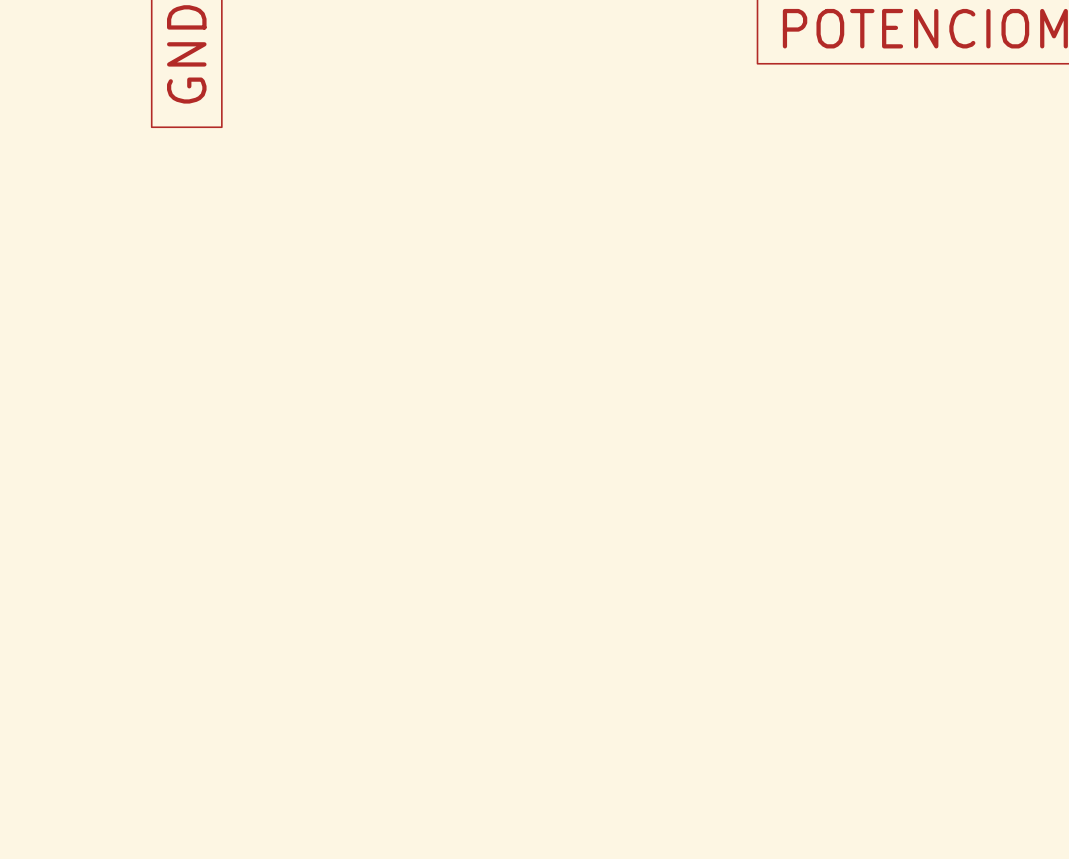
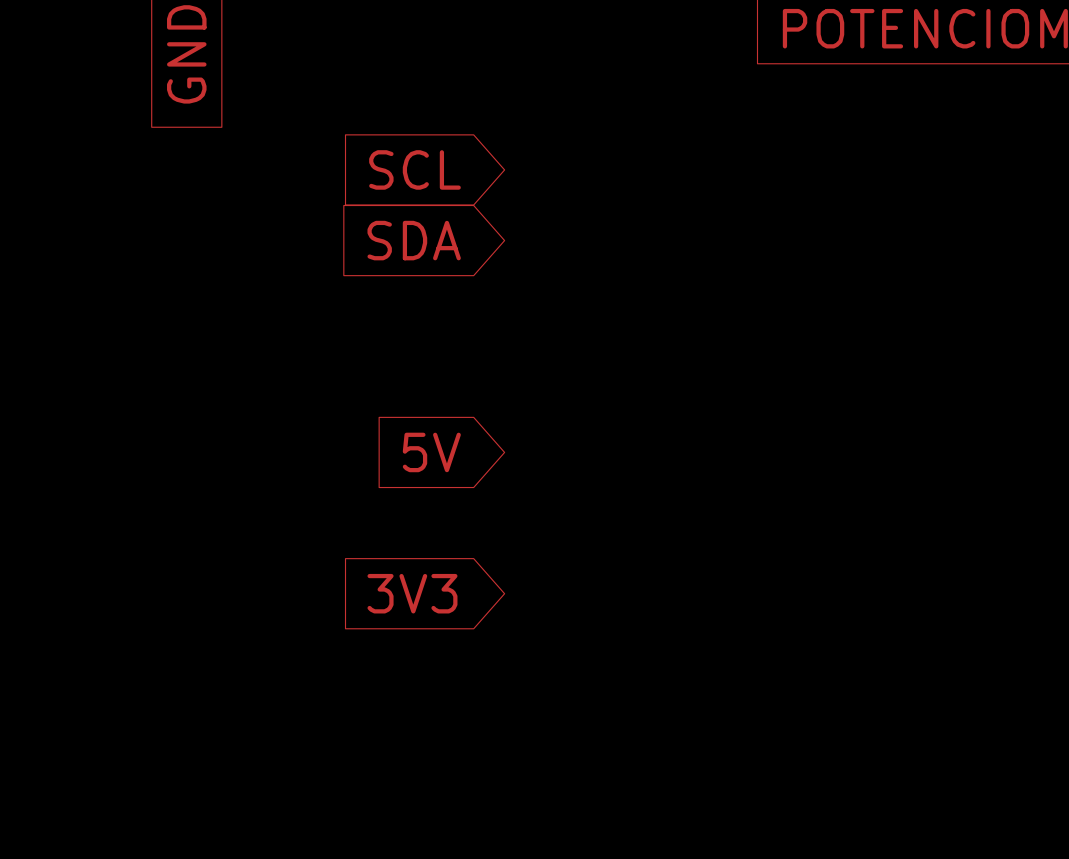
global label: none -> SCL (415, 169)
global label: none -> SDA (414, 240)
global label: none -> 5V (431, 452)
global label: none -> 3V3 (412, 593)

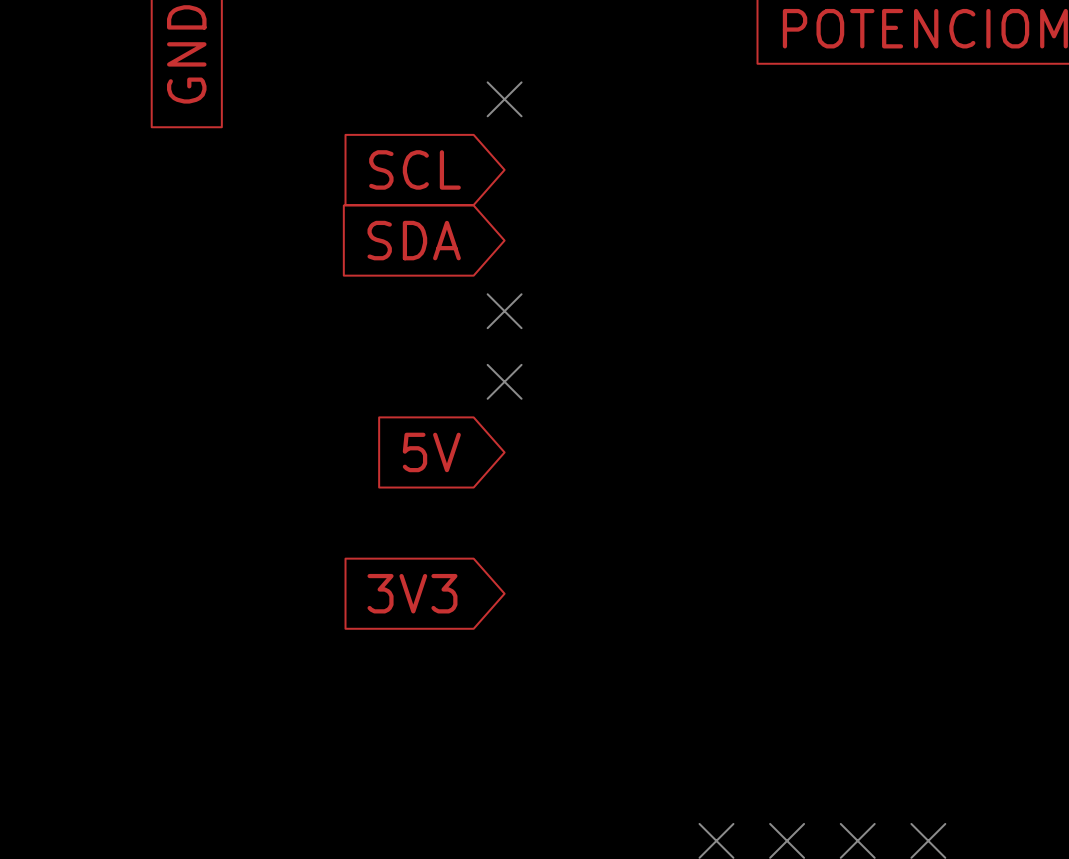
no-connect mark: none -> (504, 99)
no-connect mark: none -> (504, 311)
no-connect mark: none -> (504, 381)
no-connect mark: none -> (716, 840)
no-connect mark: none -> (787, 840)
no-connect mark: none -> (857, 840)
no-connect mark: none -> (928, 840)

